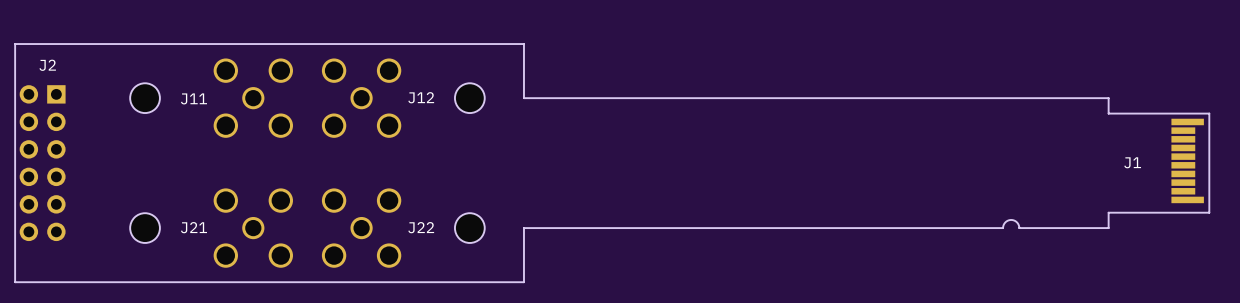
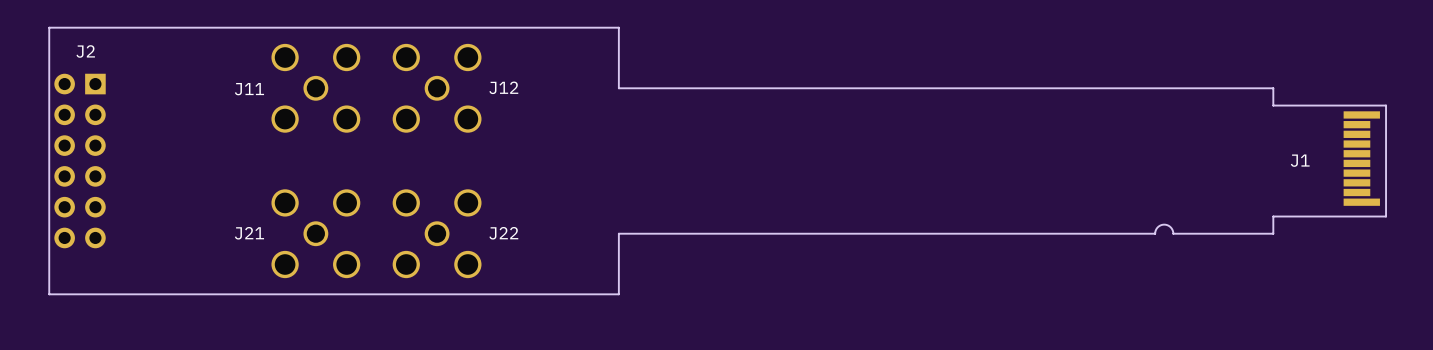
part: (145, 98) -> none
part: (469, 98) -> none
part: (145, 228) -> none
part: (469, 228) -> none

